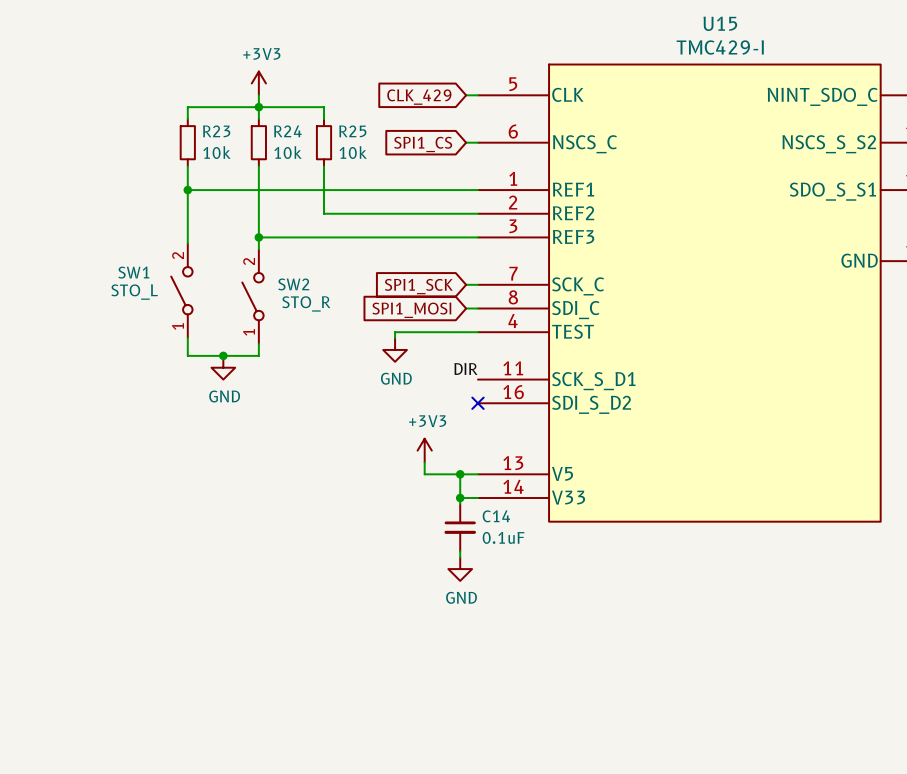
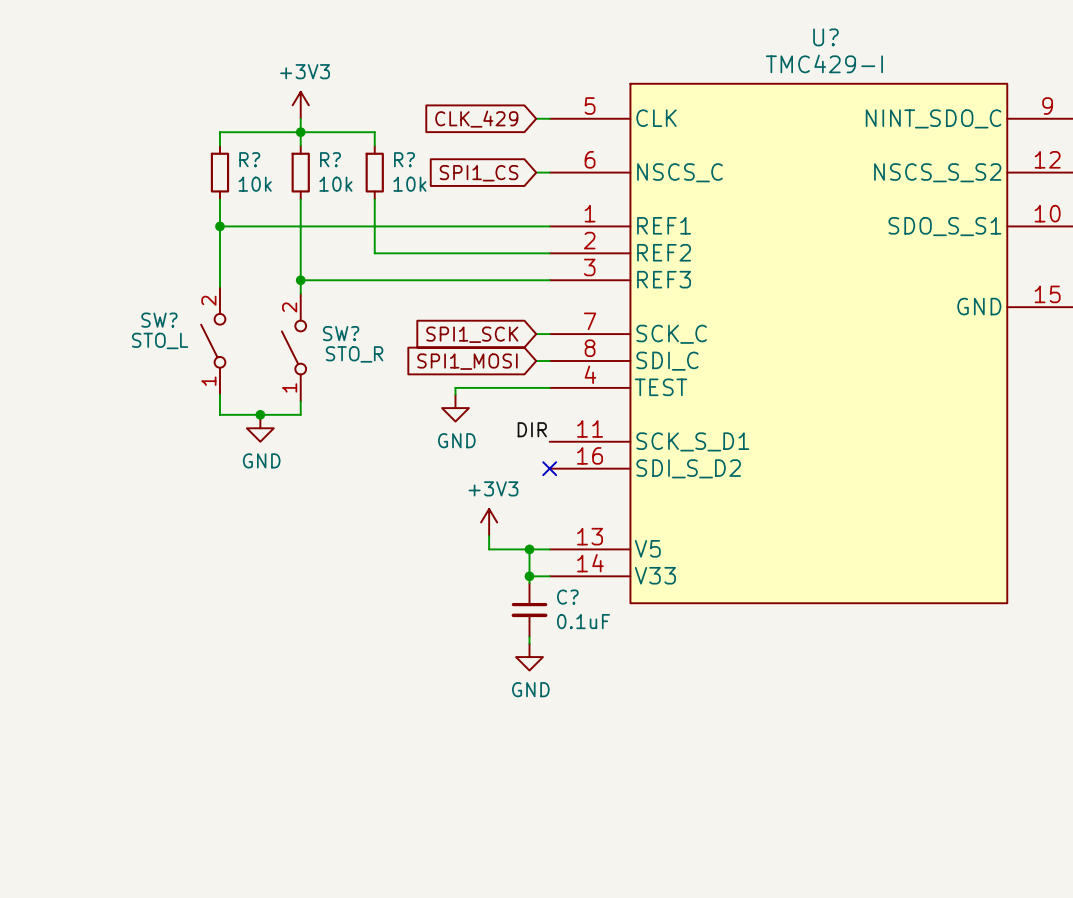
U15 name: U15 (720, 23) -> U? (825, 37)
R23 name: R23 (216, 131) -> R? (249, 159)
R24 name: R24 (287, 131) -> R? (330, 159)
R25 name: R25 (352, 131) -> R? (404, 159)
SW1 name: SW1 (133, 272) -> SW? (159, 320)
SW2 name: SW2 (293, 284) -> SW? (341, 333)
C14 name: C14 (496, 516) -> C? (567, 597)

